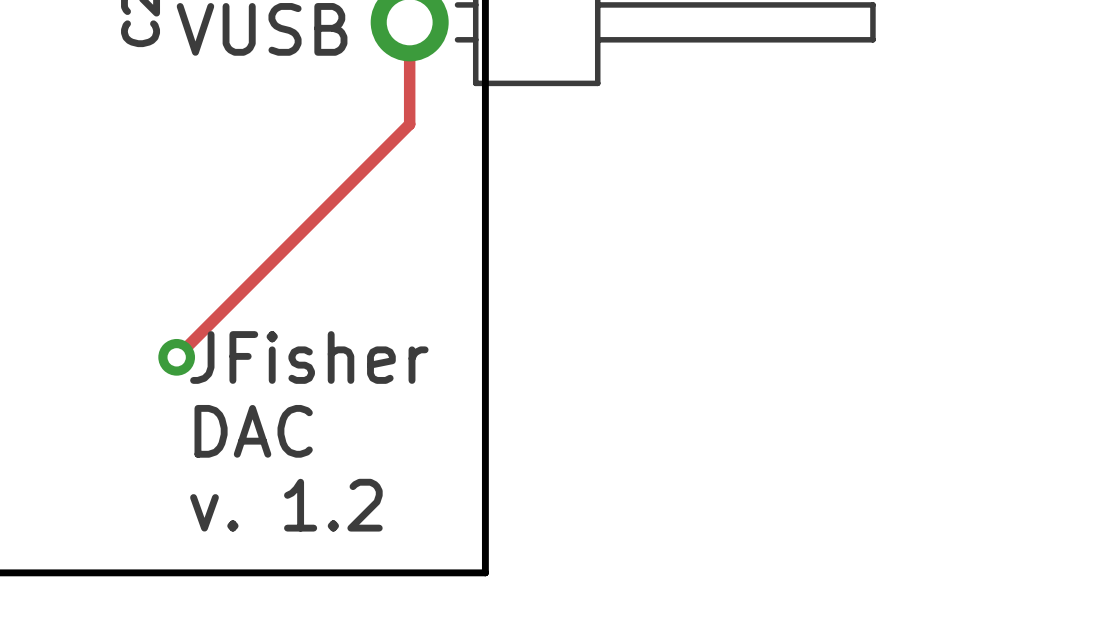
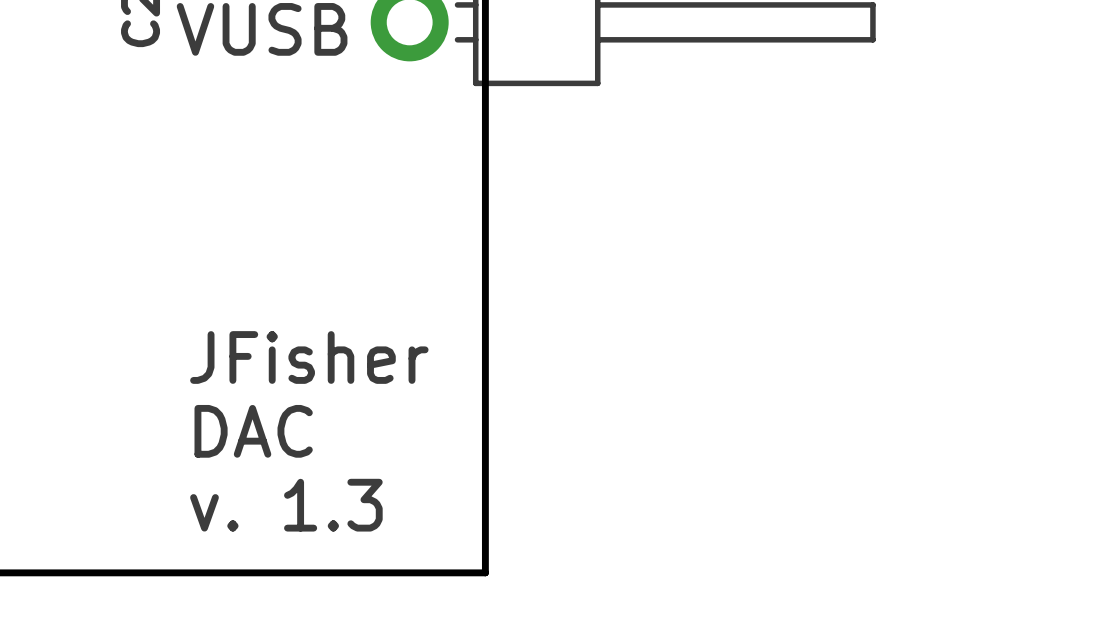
track: (409, 22) (409, 124) (176, 357) -> none
via: (176, 357) -> none
text: v. 1.2 (286, 505) -> v. 1.3 (286, 505)

